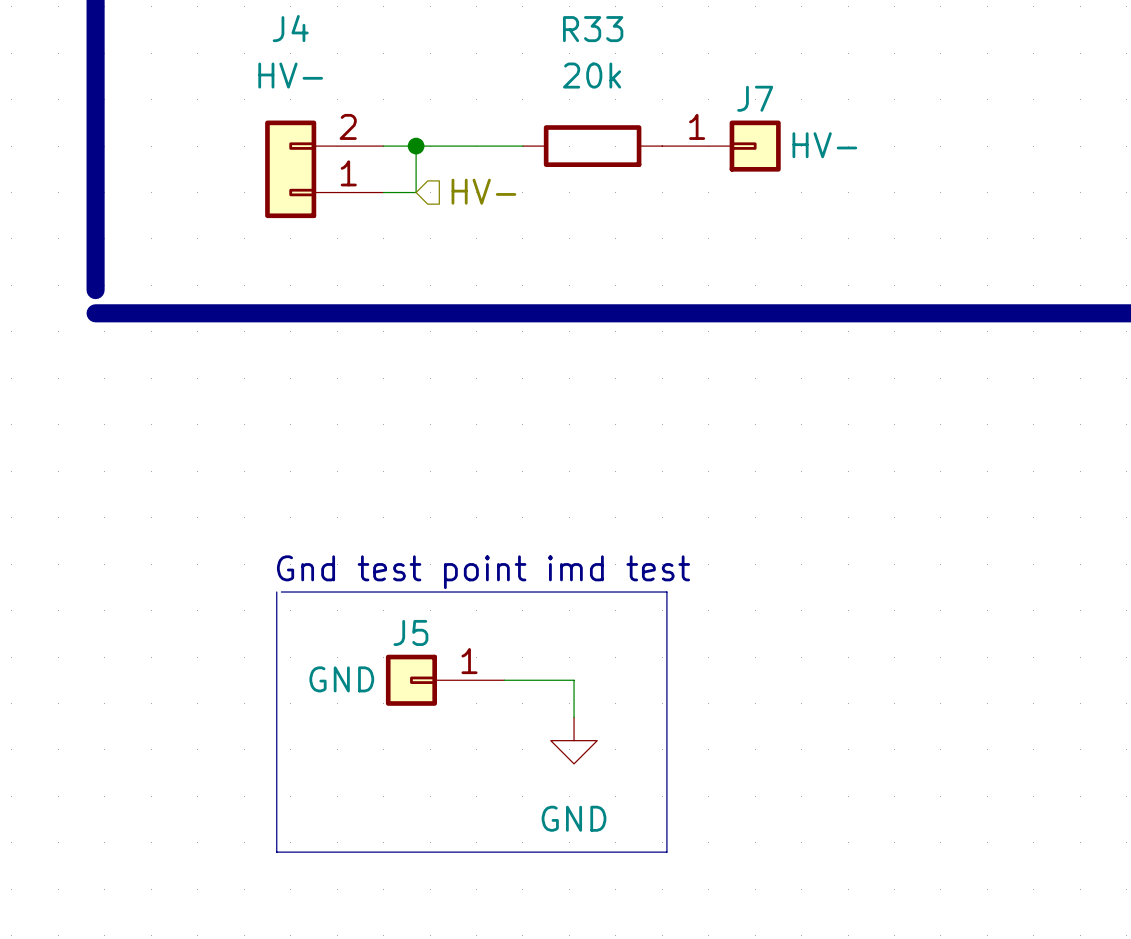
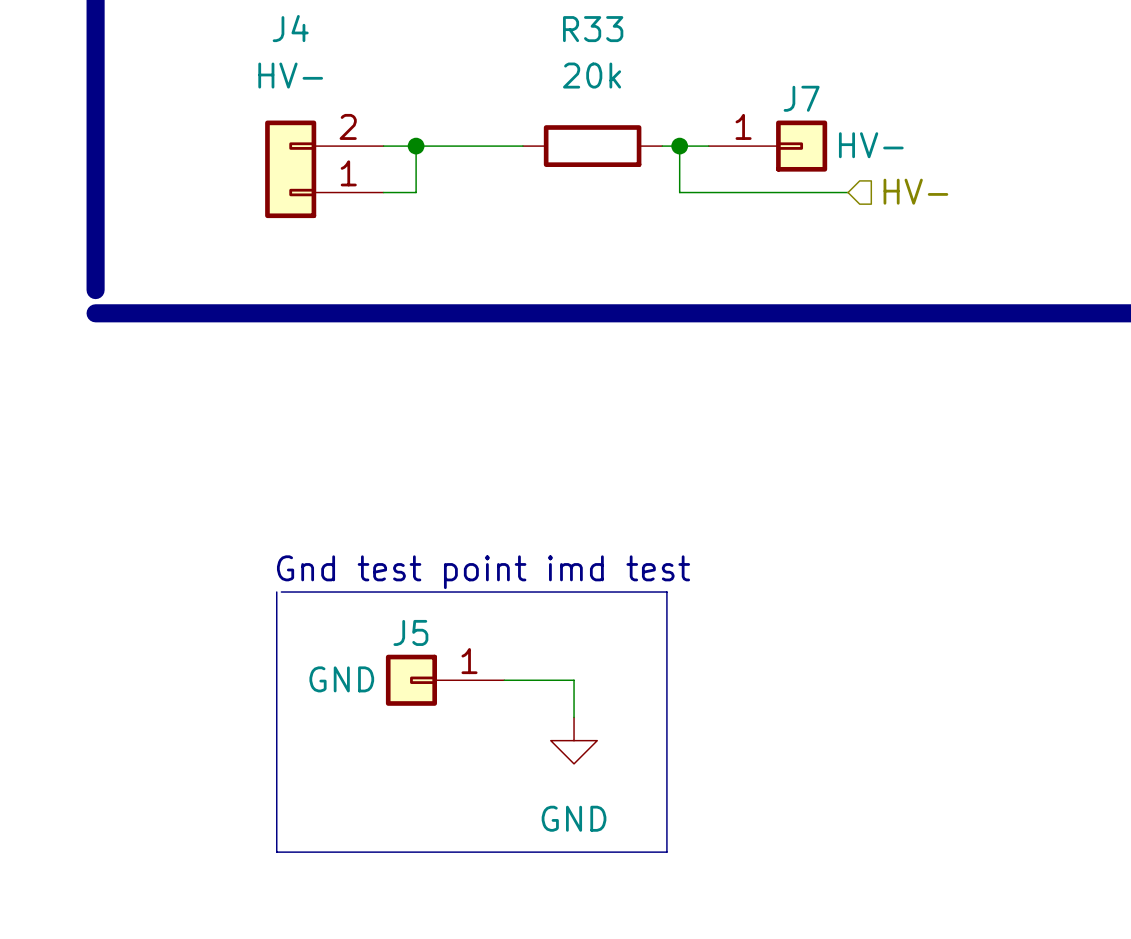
wire: none -> (679, 146) (679, 192) (848, 192)
junction: none -> (679, 146)
J7 position: (721, 146) -> (767, 146)
hierarchical label position: HV- (483, 191) -> HV- (915, 191)

